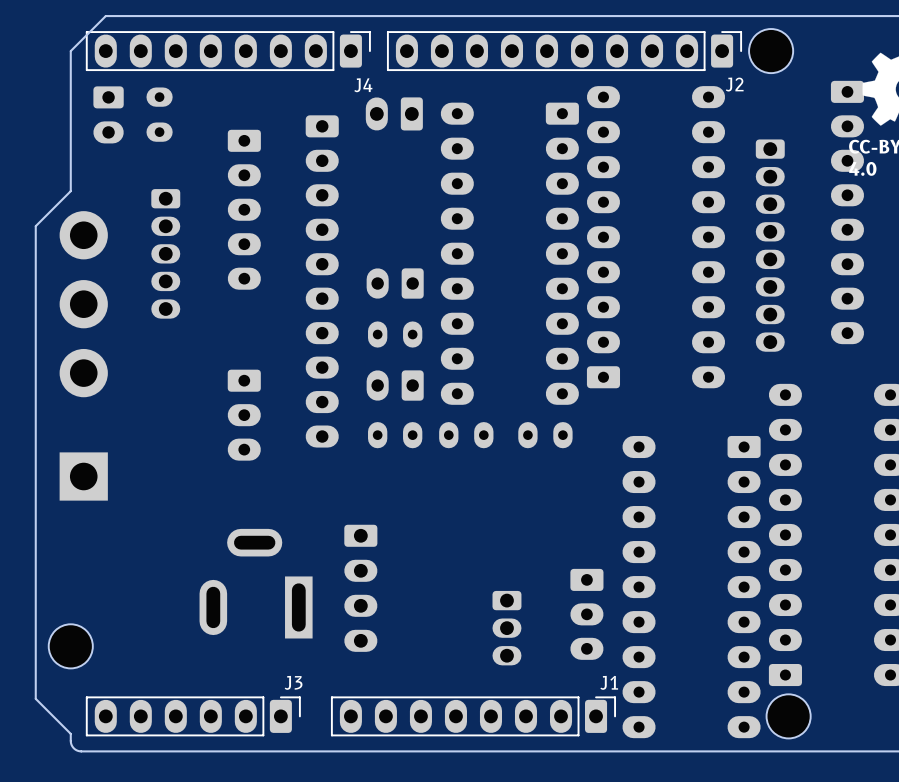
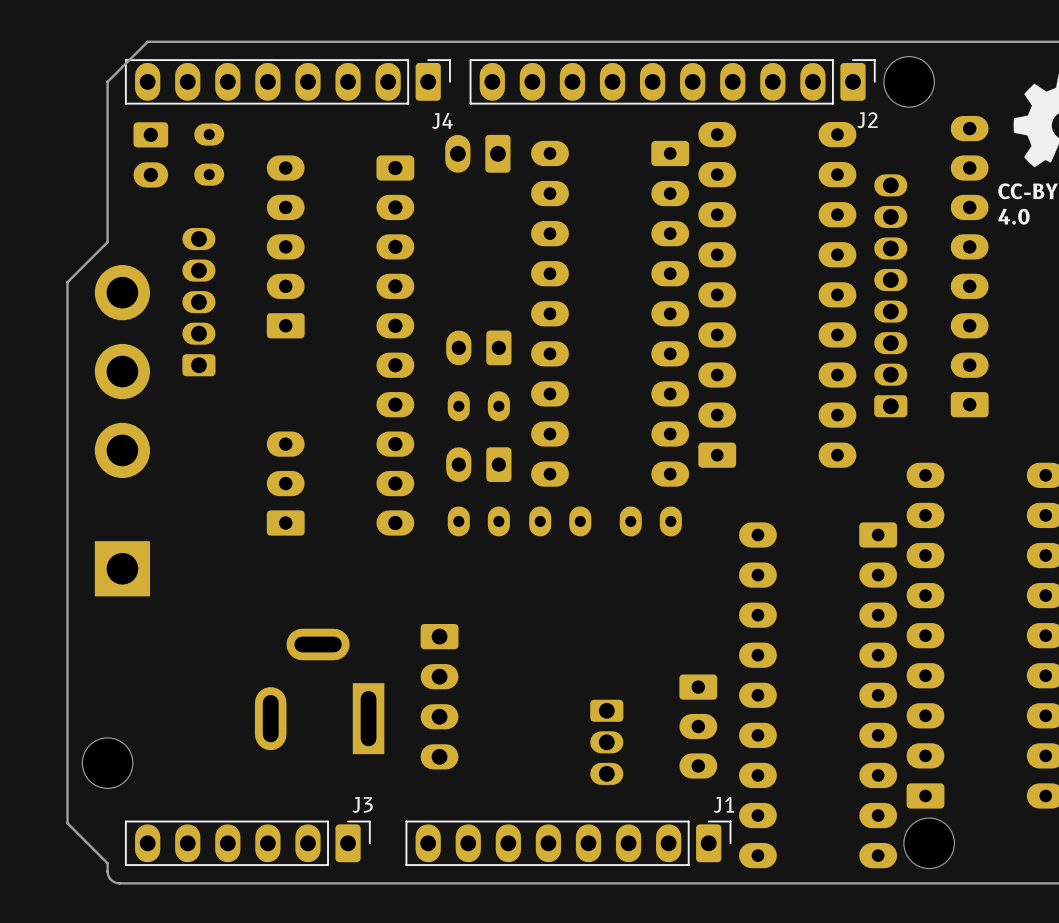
part rotation: 0° (244, 209) -> 180° (285, 246)
part rotation: 0° (847, 212) -> 180° (969, 266)
part rotation: 0° (770, 245) -> 180° (890, 295)
part rotation: 0° (165, 253) -> 180° (198, 302)
part rotation: 0° (244, 415) -> 180° (285, 483)

